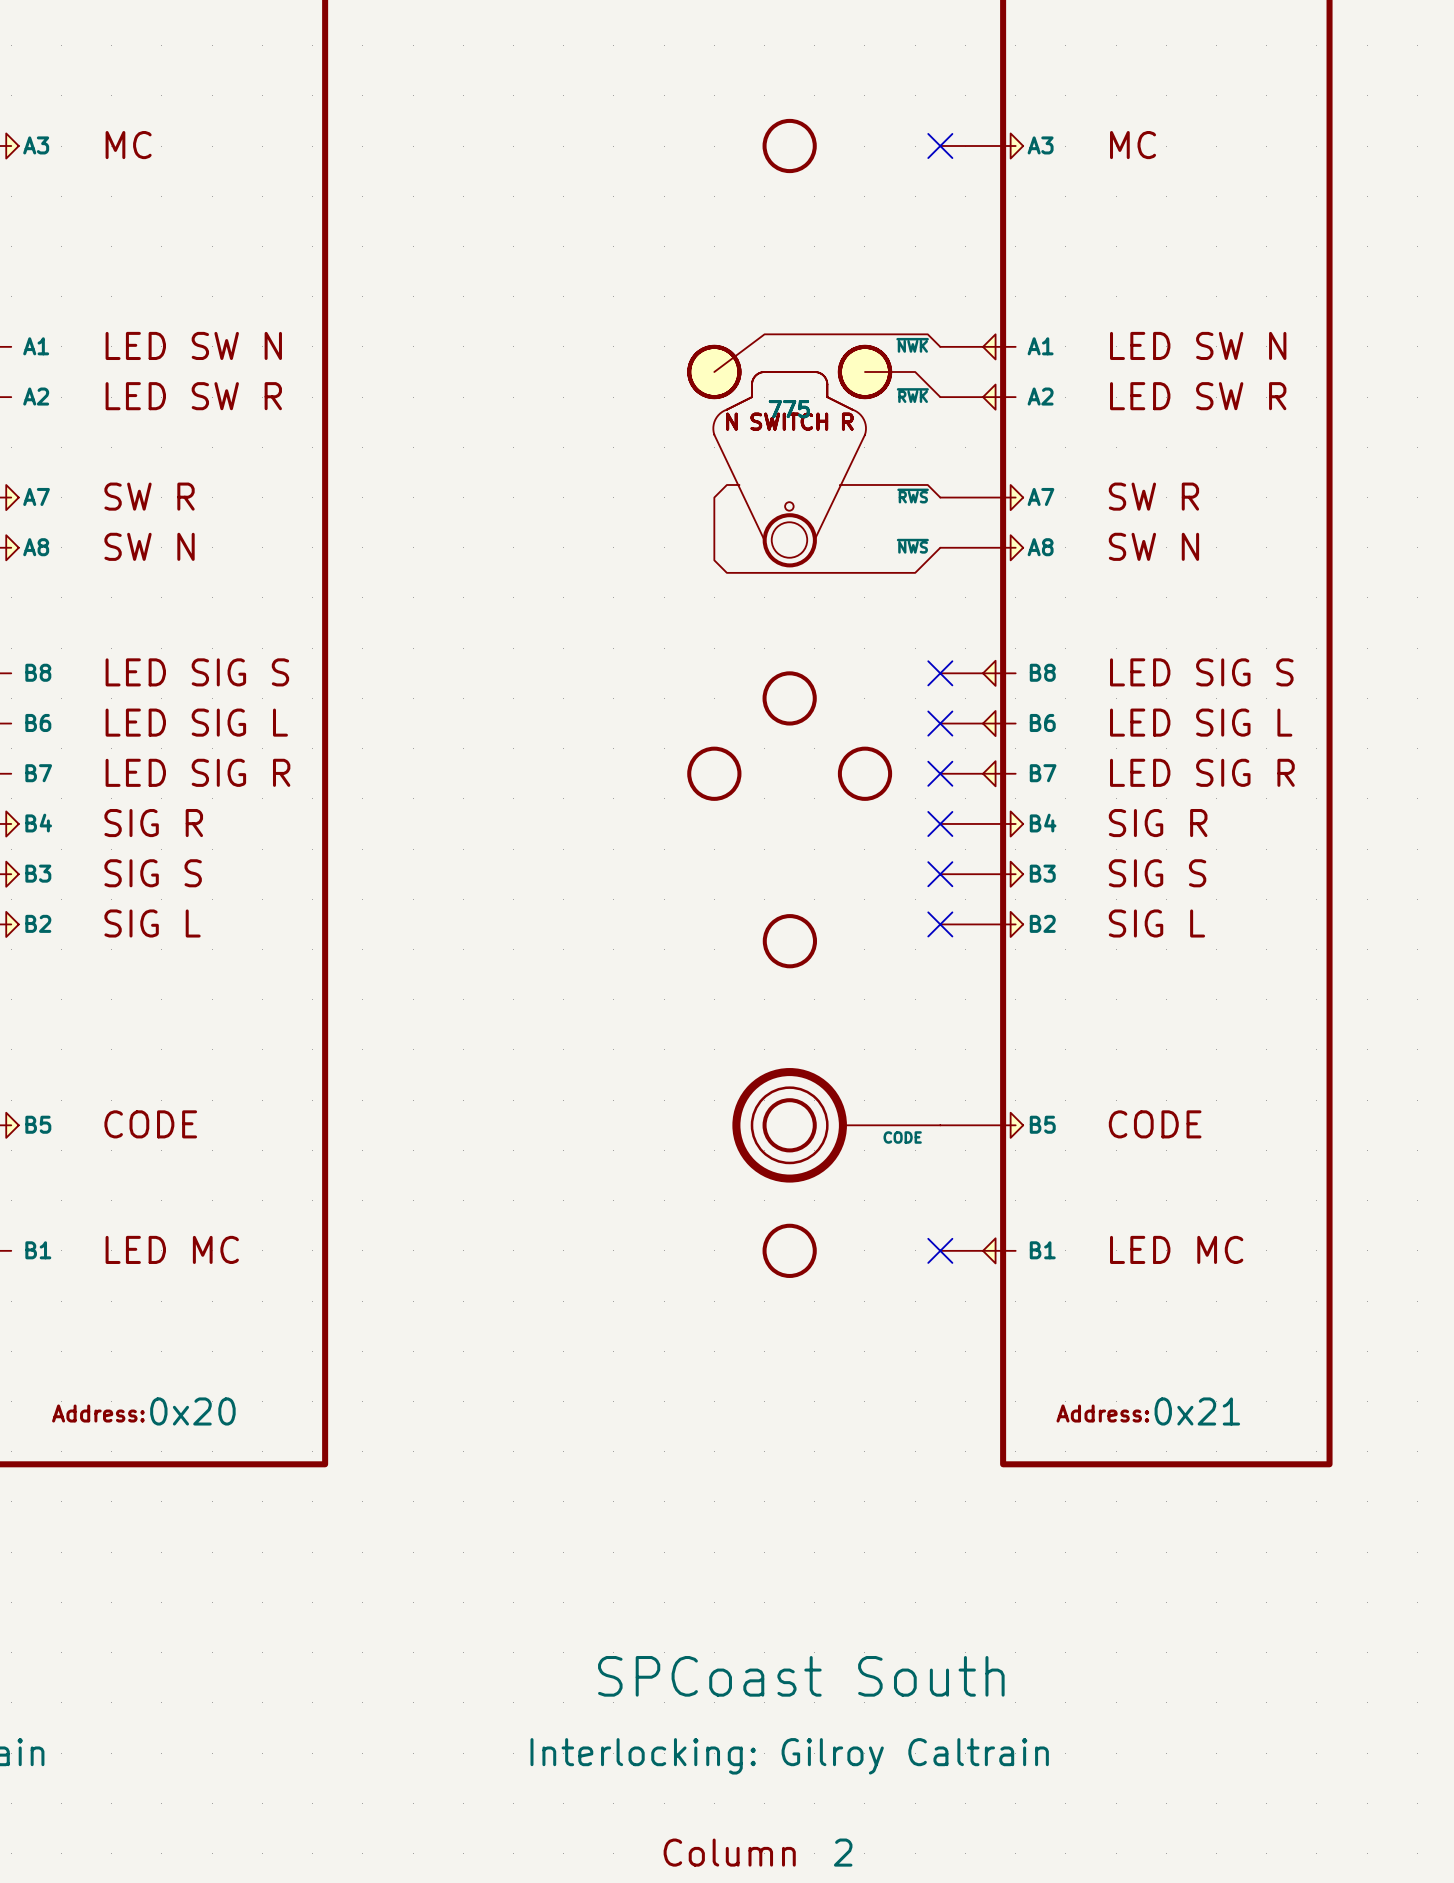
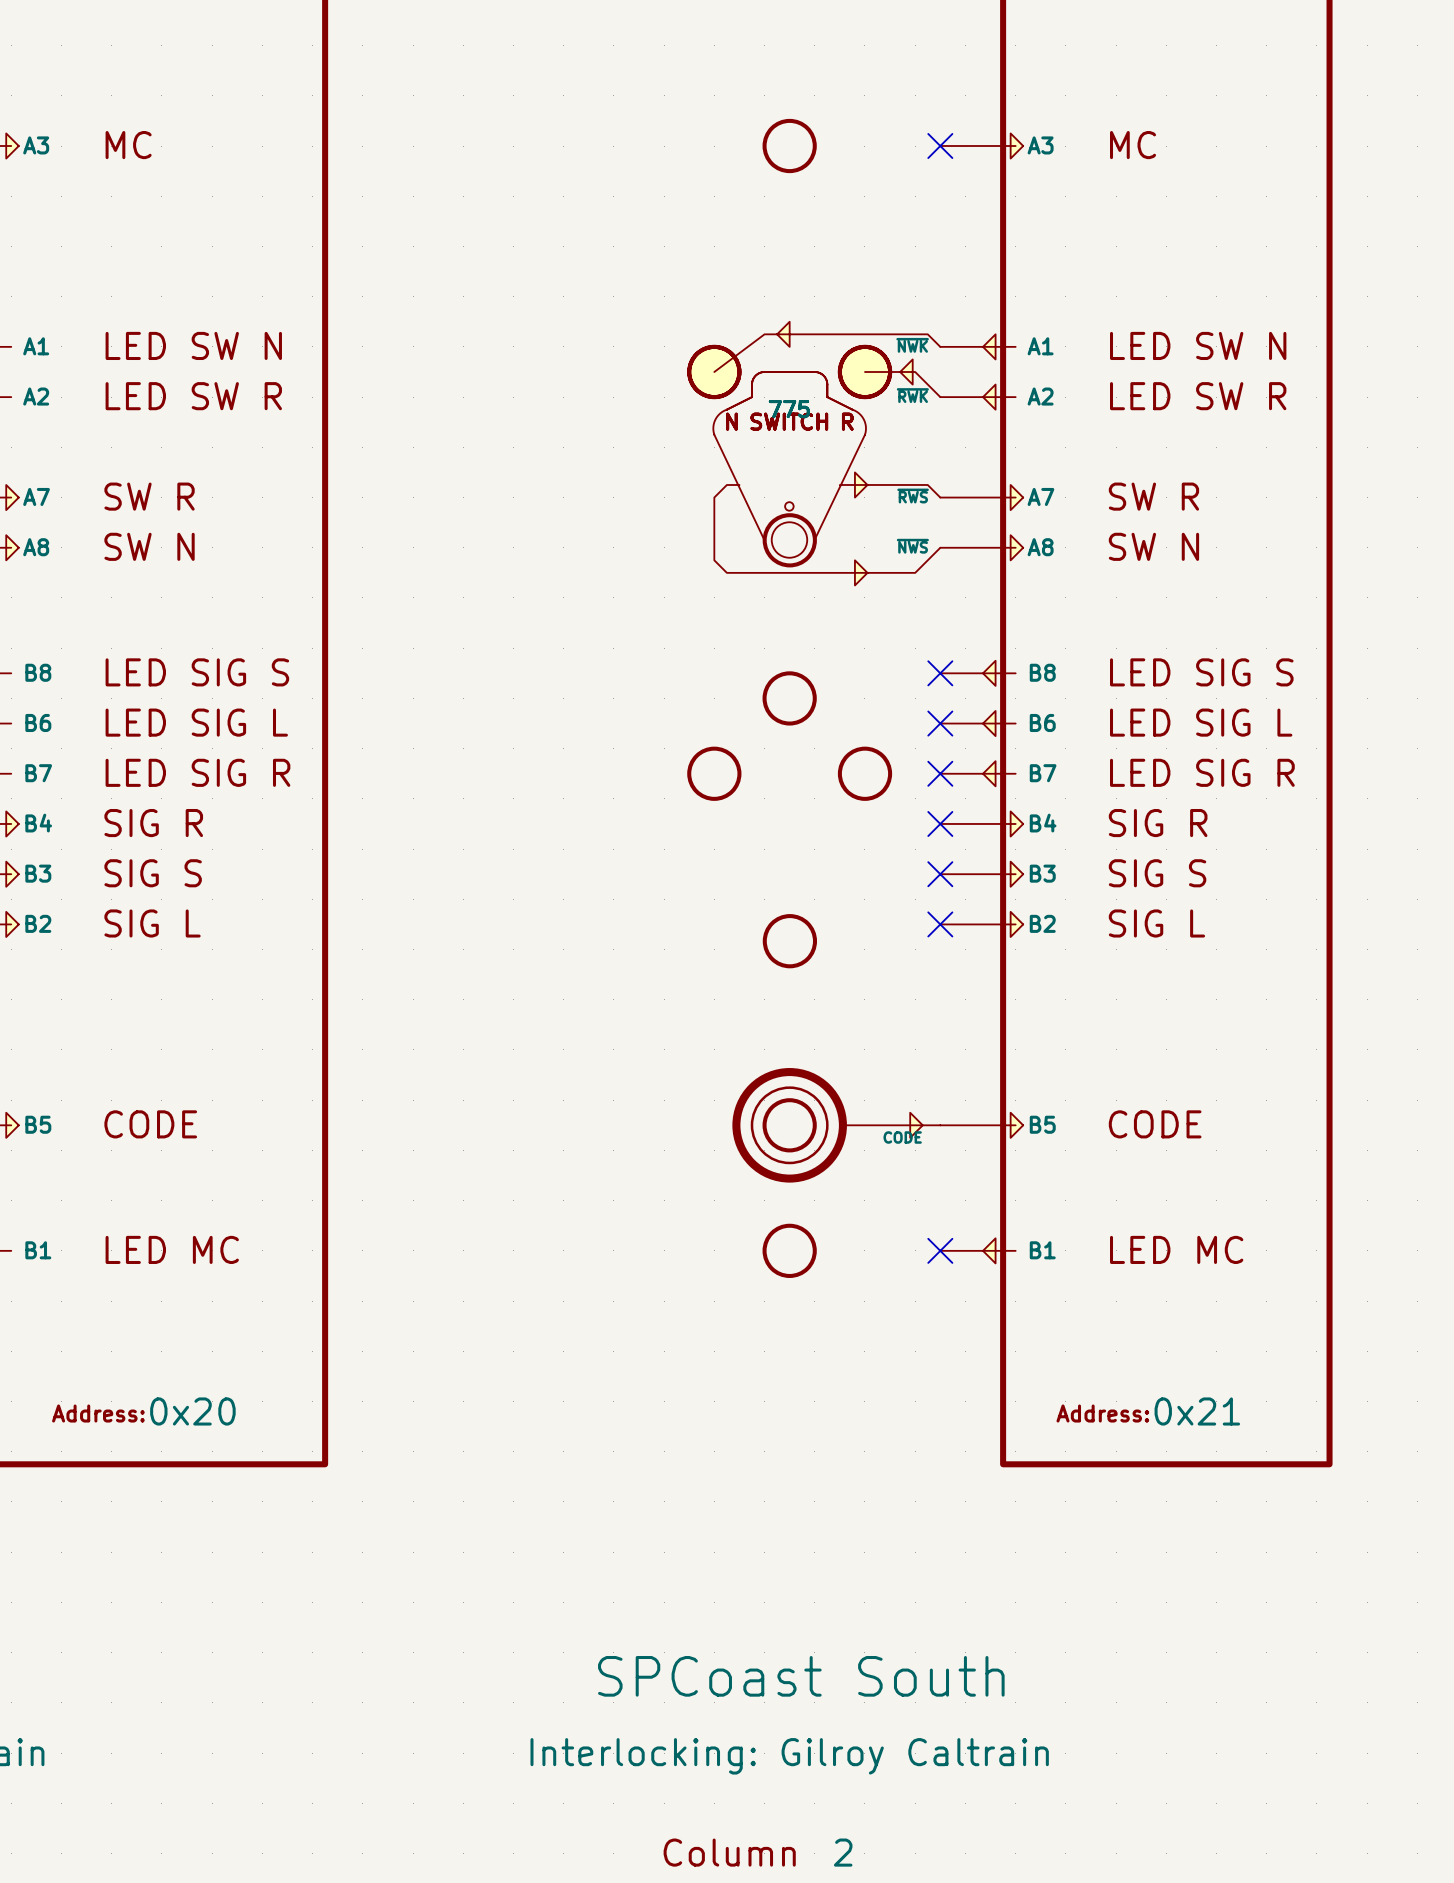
part symbol: [687, 334, 941, 410] -> [687, 321, 941, 410]
part symbol: [713, 371, 941, 573] -> [713, 371, 941, 586]
part symbol: [732, 1068, 941, 1183] -> [732, 1068, 941, 1183]

